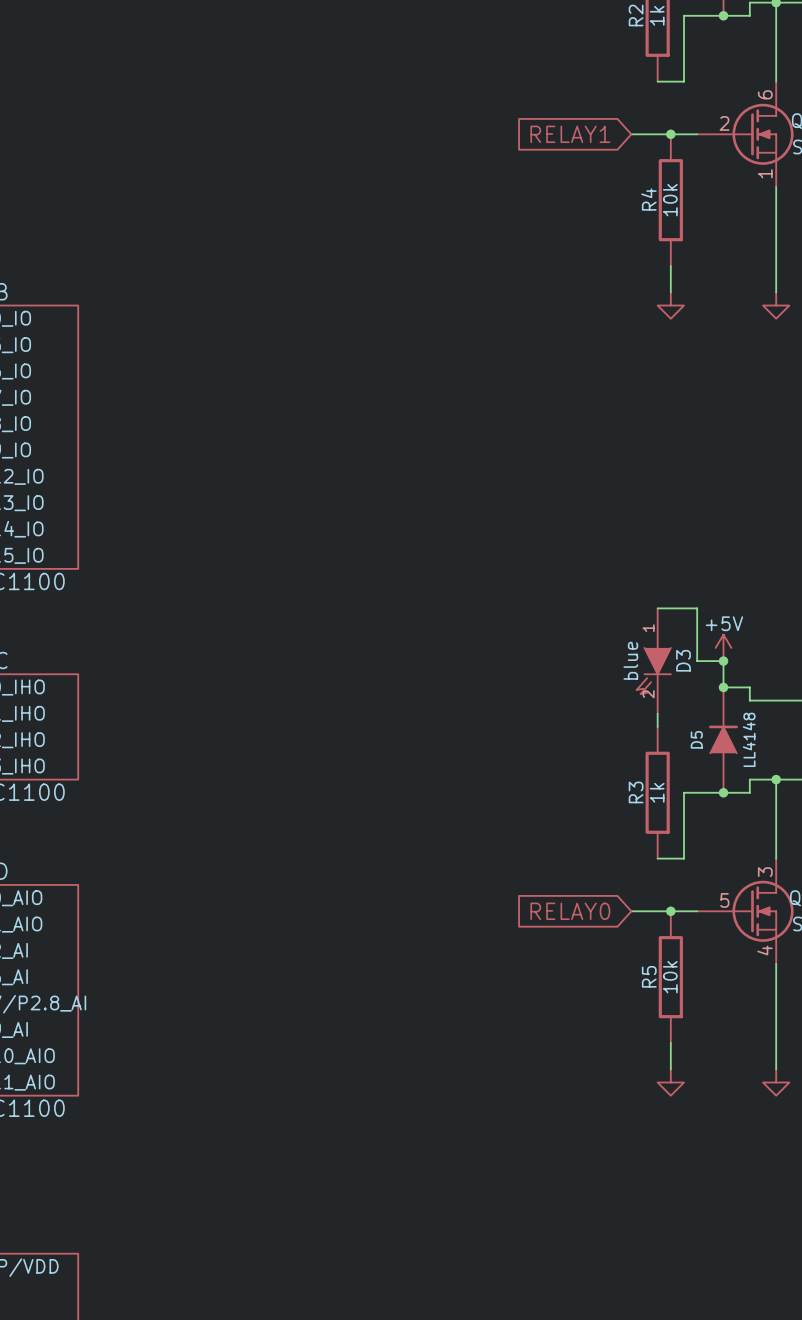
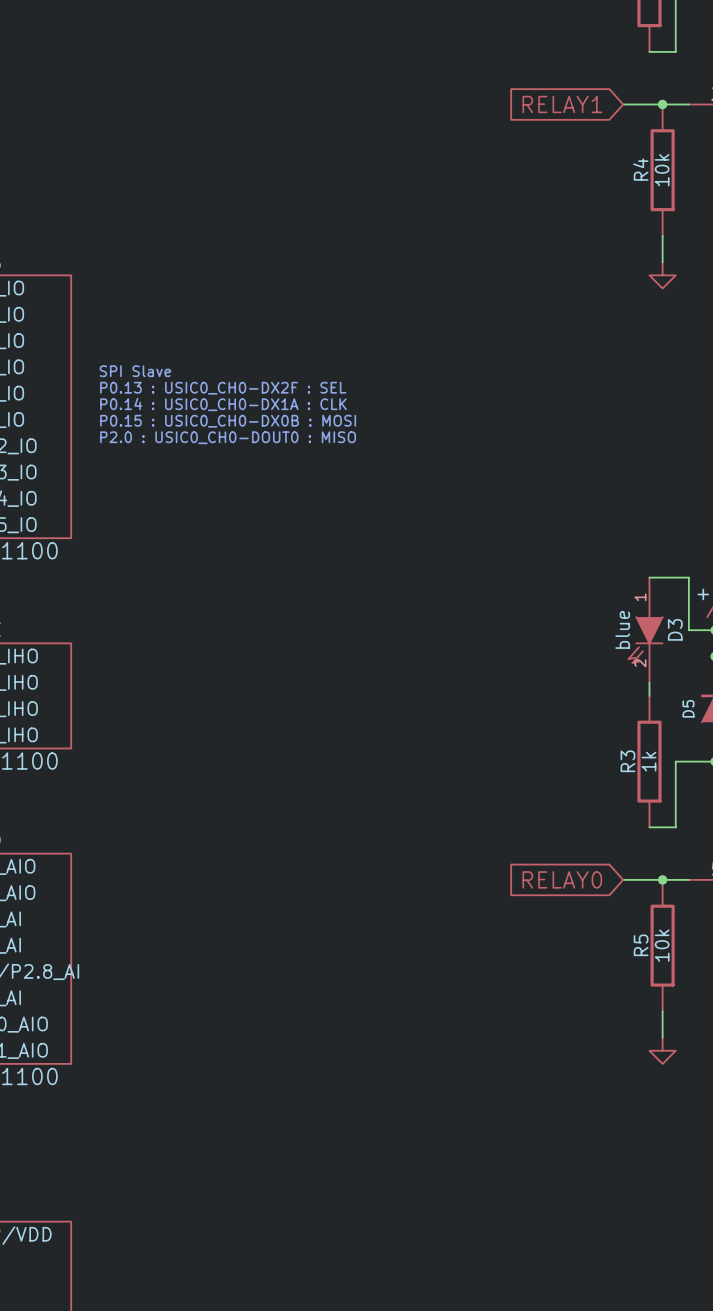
text: none -> SPI Slave (135, 371)
text: none -> P0.13 : USIC0_CH0-DX2F : SEL (223, 388)
text: none -> P0.14 : USIC0_CH0-DX1A : CLK (223, 404)
text: none -> P0.15 : USIC0_CH0-DX0B : MOSI (228, 421)
text: none -> P2.0 : USIC0_CH0-DOUT0 : MISO (228, 437)

